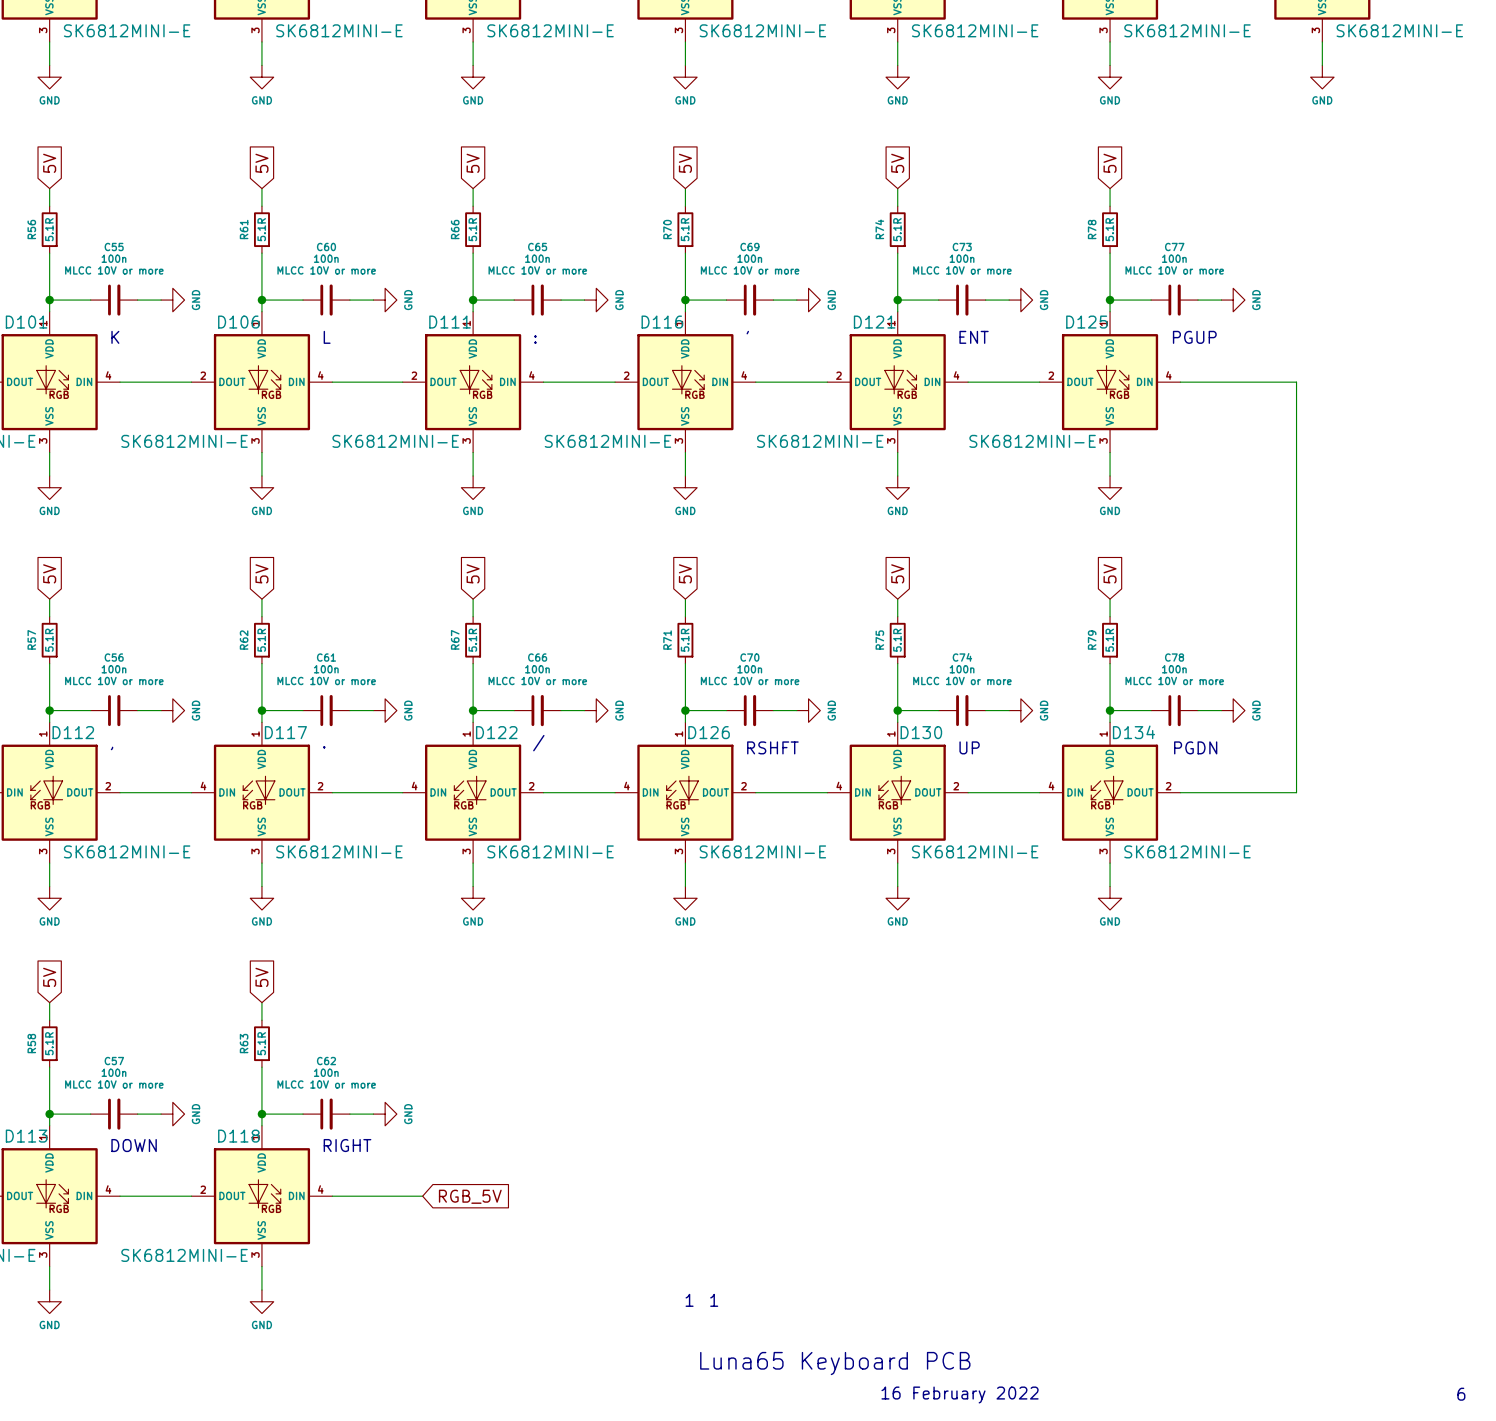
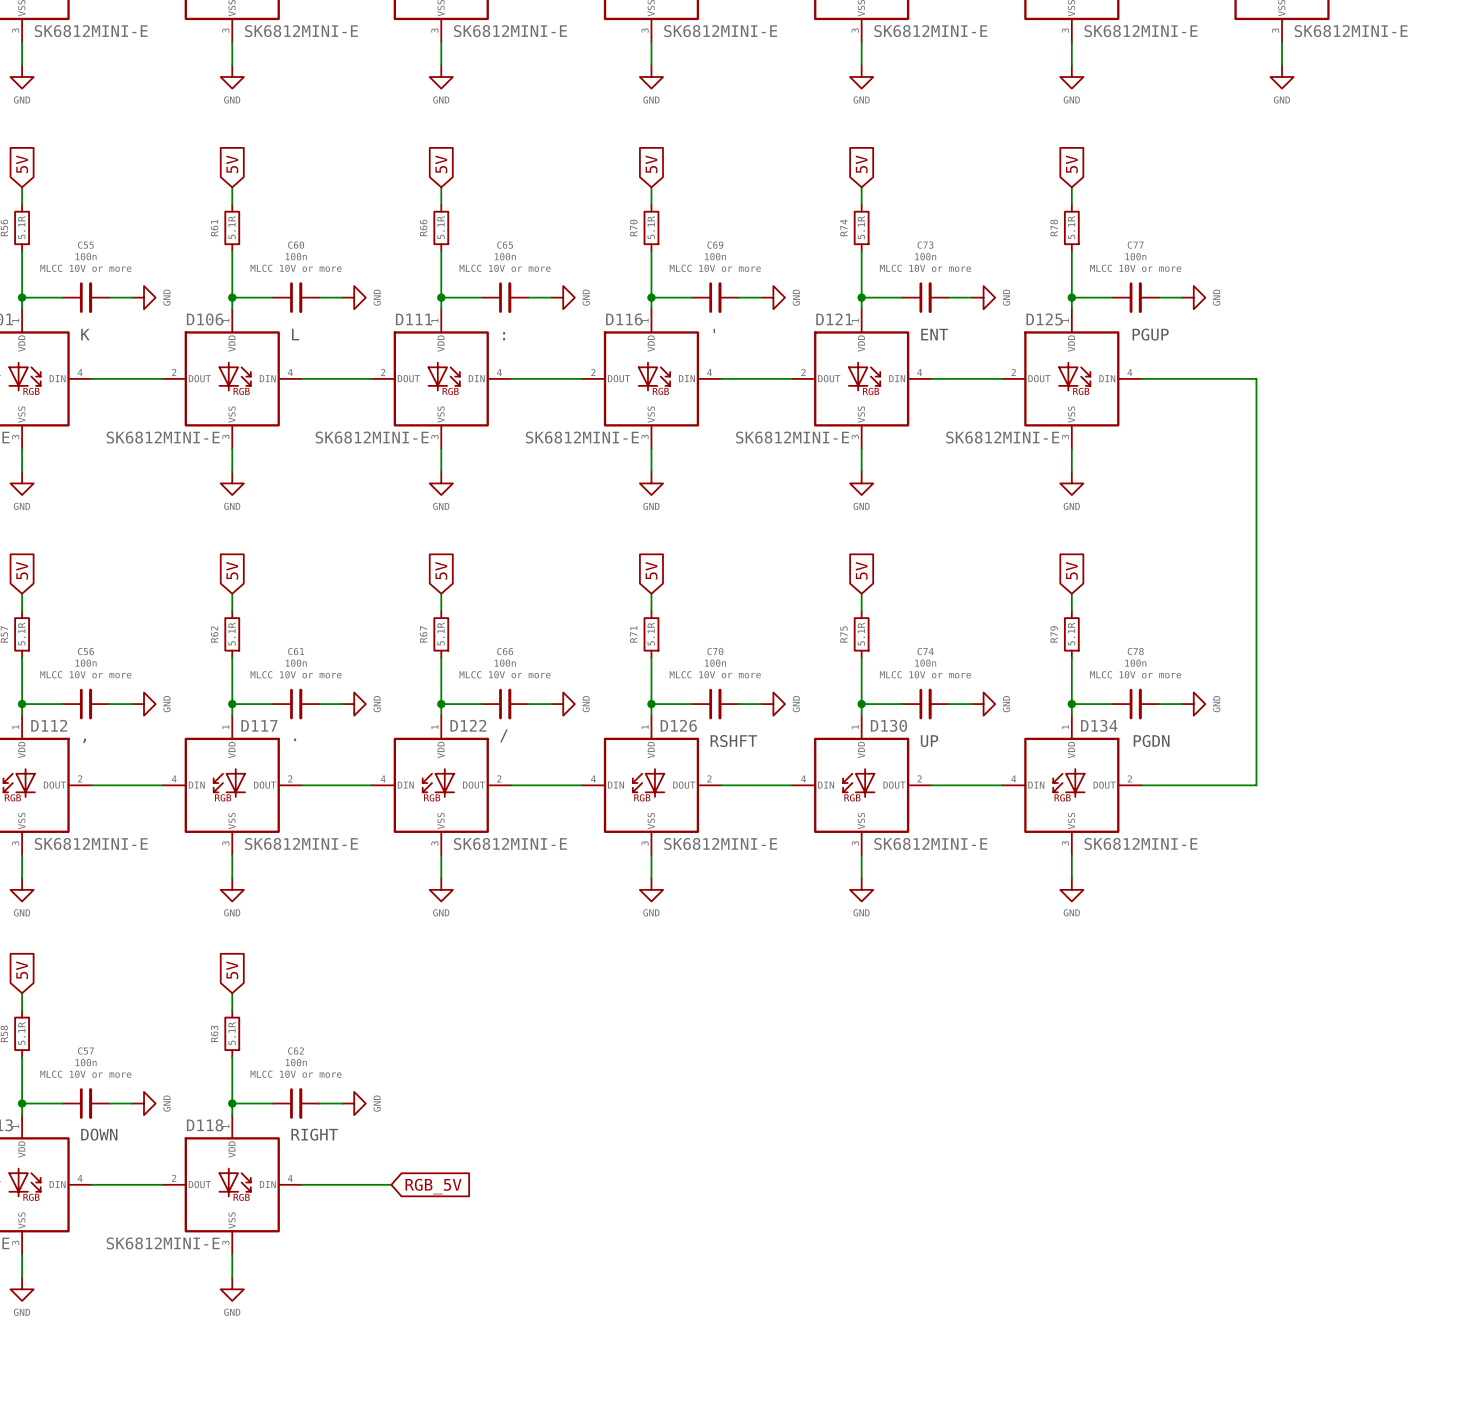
text: 1 (689, 1300) -> none
text: 1 (714, 1300) -> none
text: Luna65 Keyboard PCB (835, 1363) -> none
text: 16 February 2022 (960, 1394) -> none
text: 6 (1461, 1394) -> none

